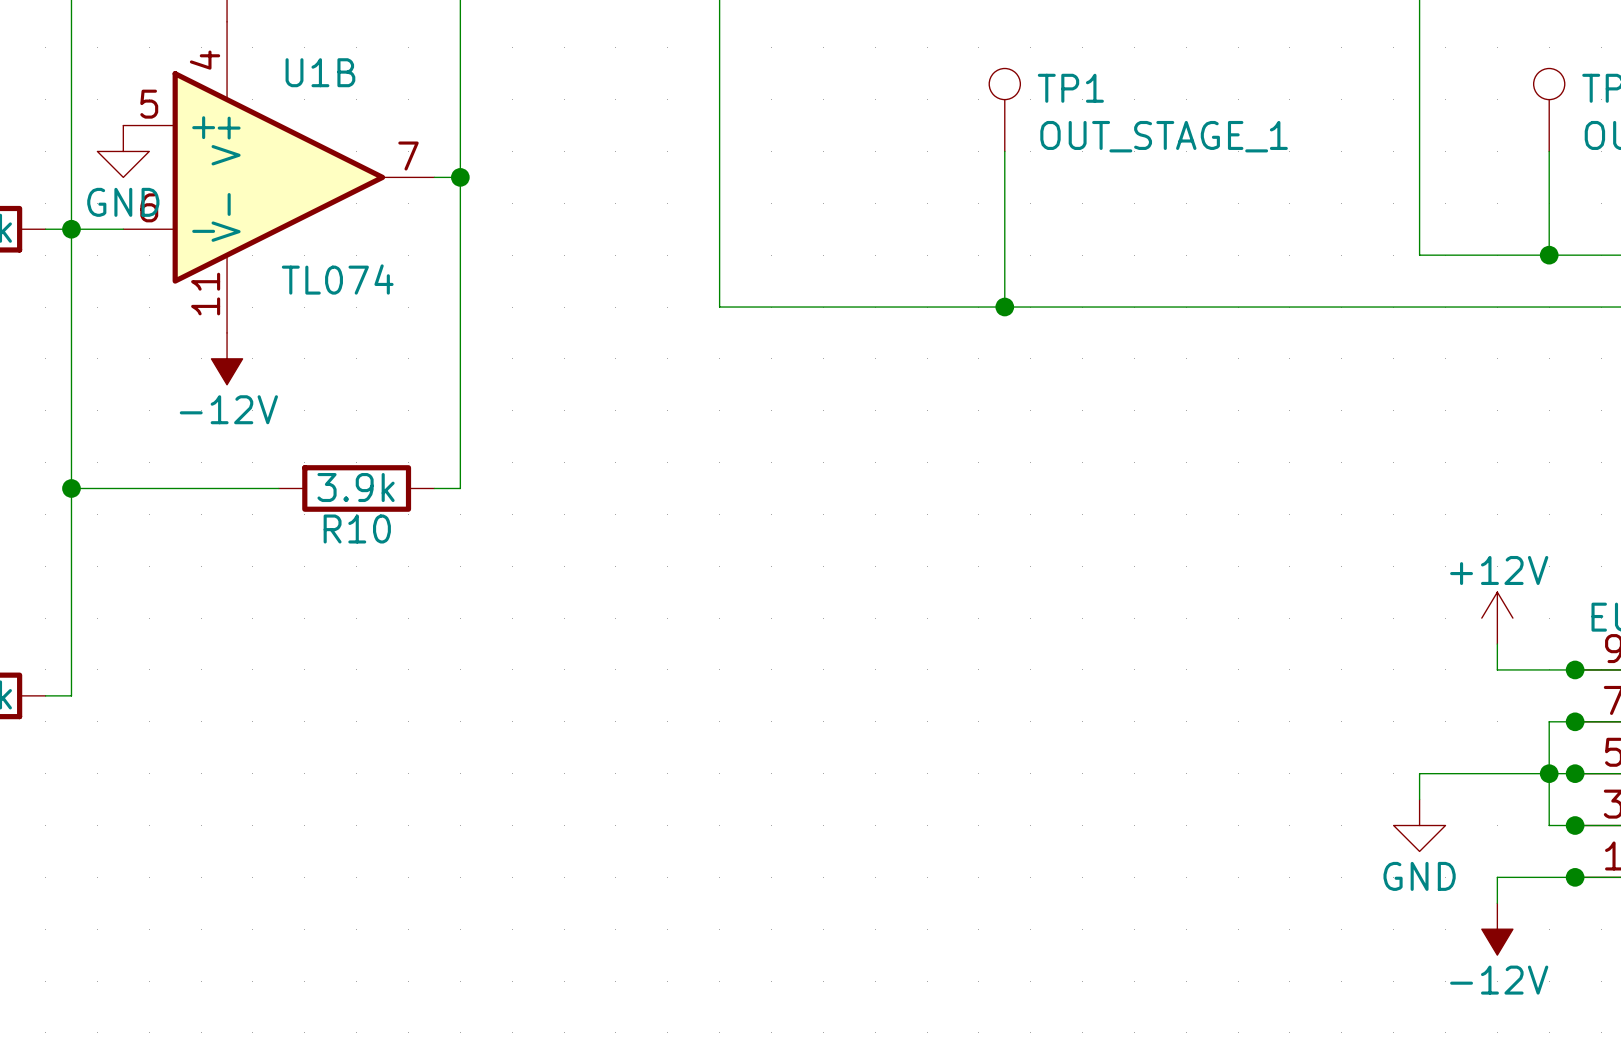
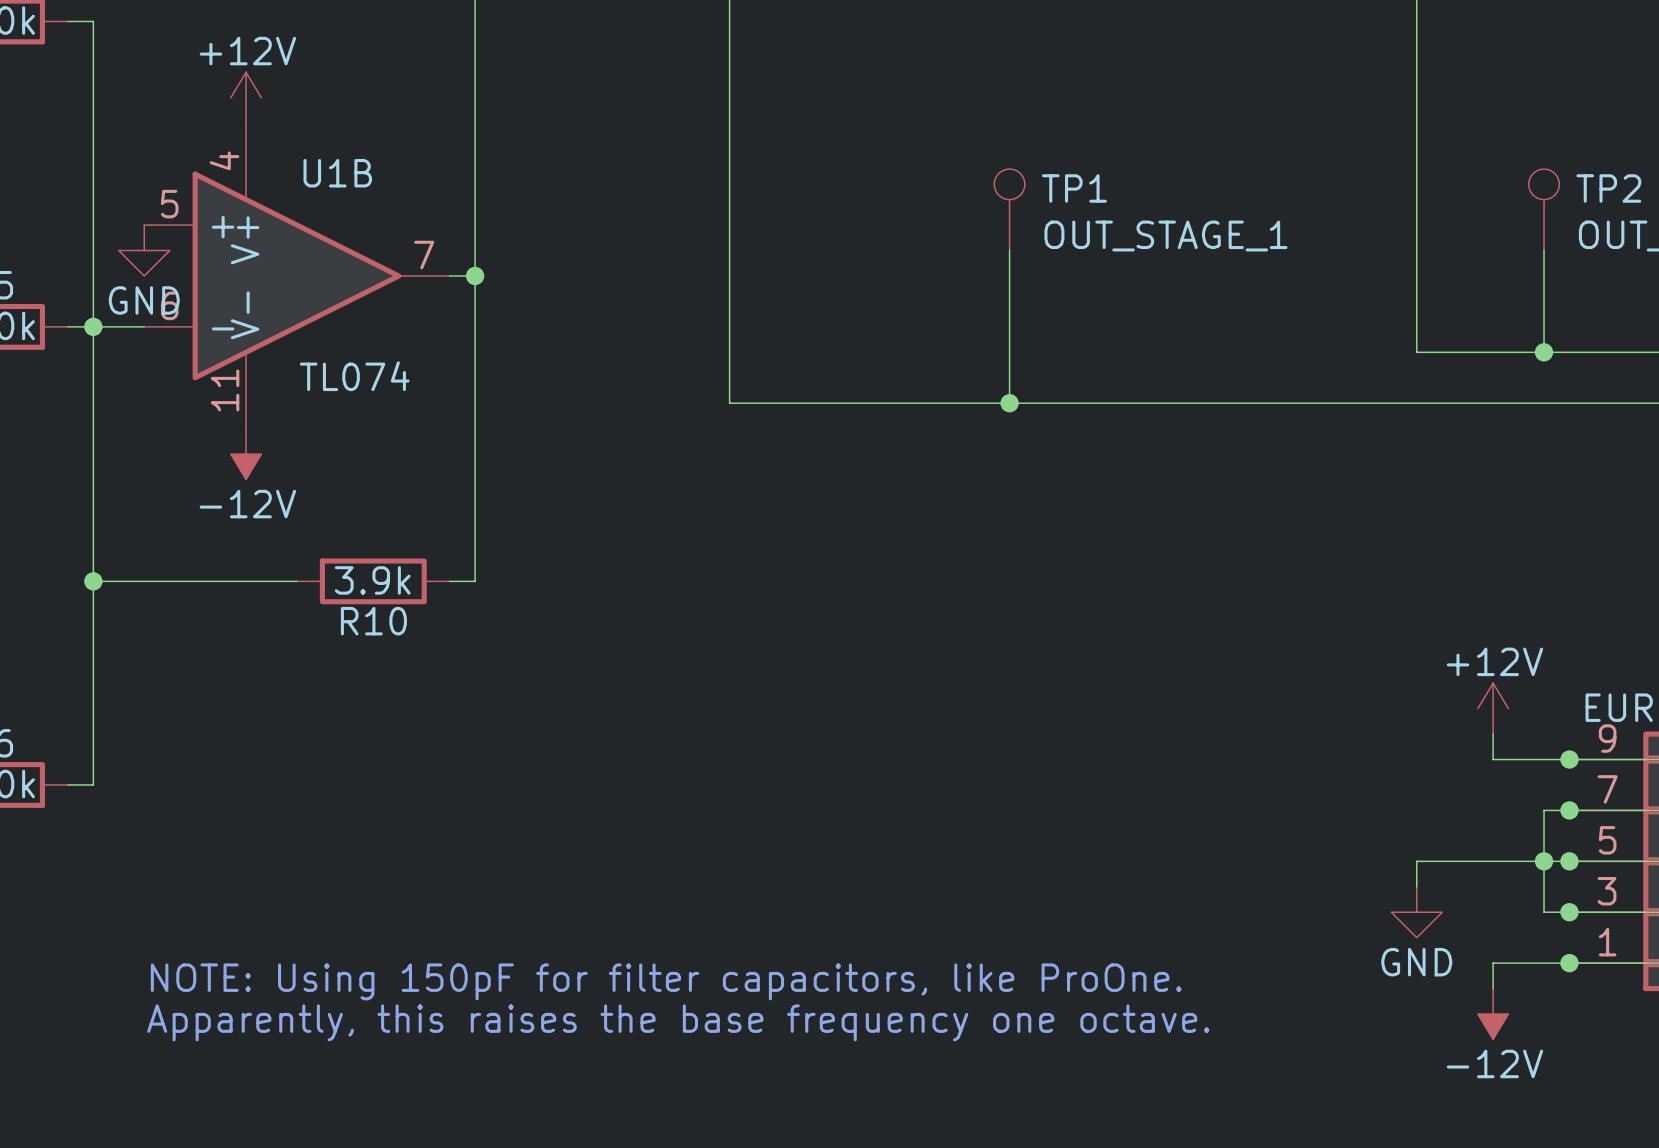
text: none -> NOTE: Using 150pF for filter capacitors, like ProOne. (666, 981)
text: none -> Apparently, this raises the base frequency one octave. (678, 1022)

